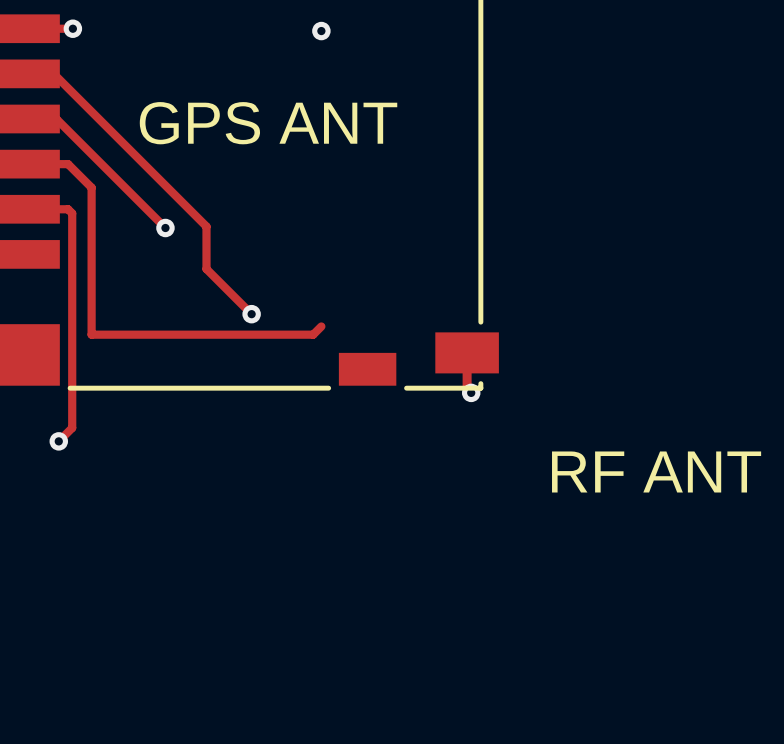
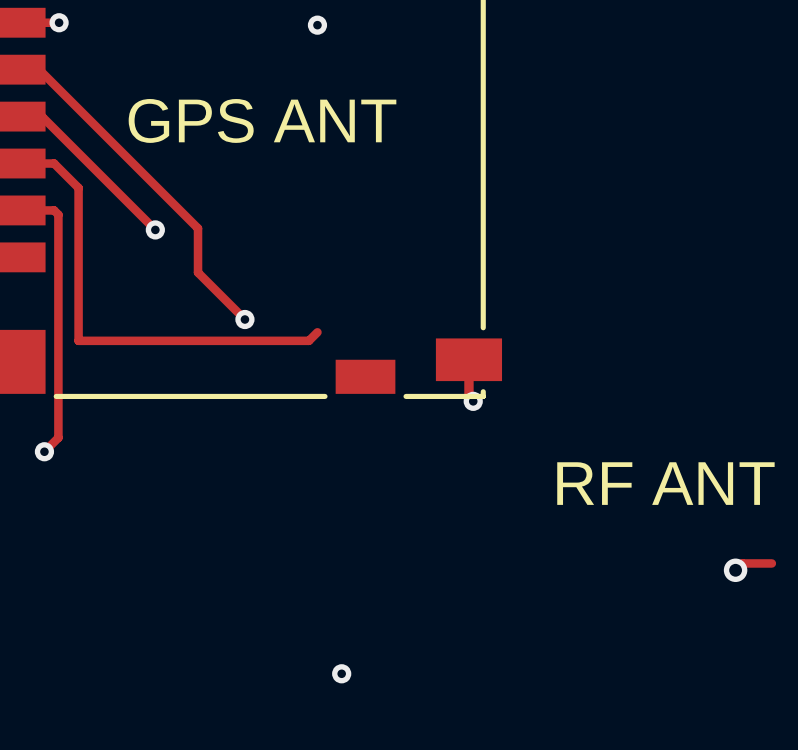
track: none -> (771, 563) (742, 563) (735, 570)
via: none -> (735, 570)
via: none -> (341, 673)

